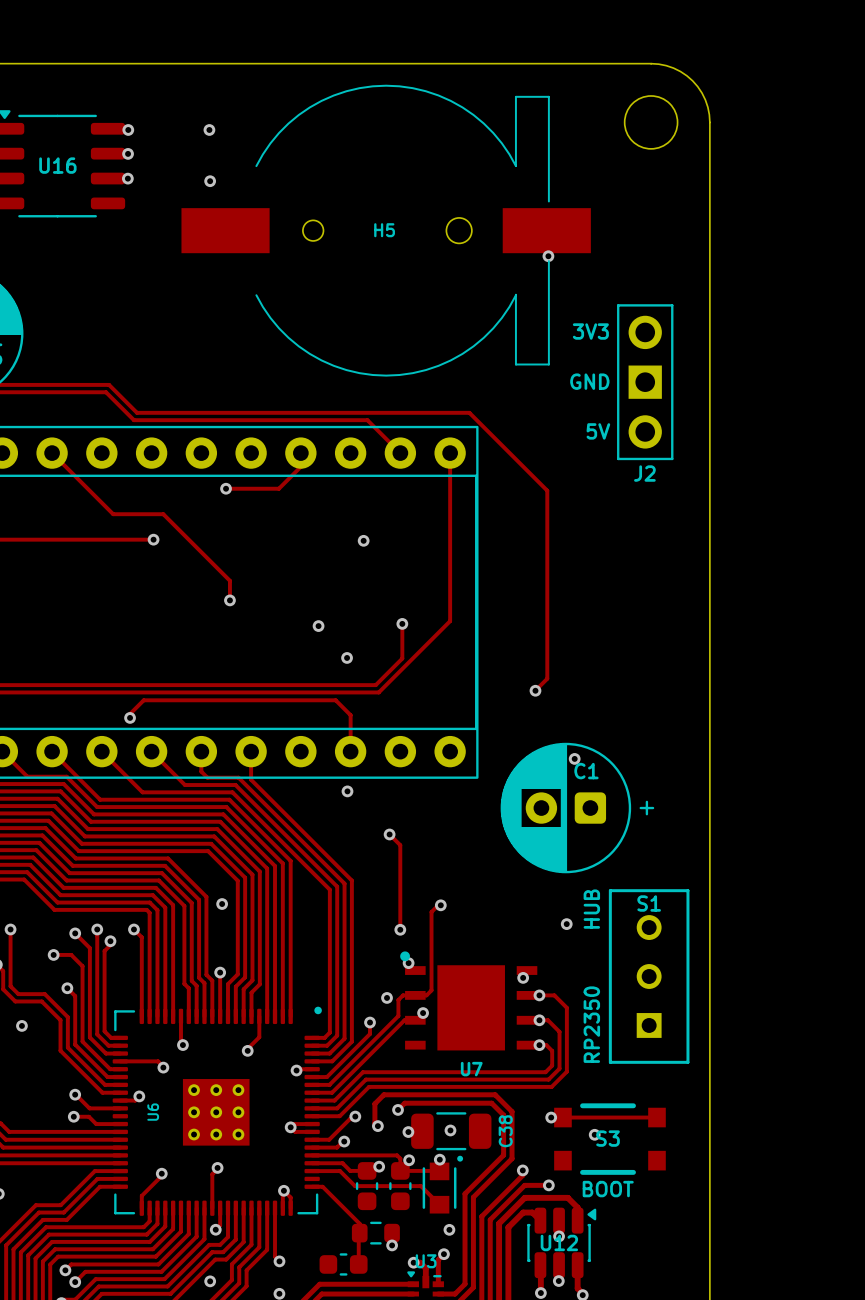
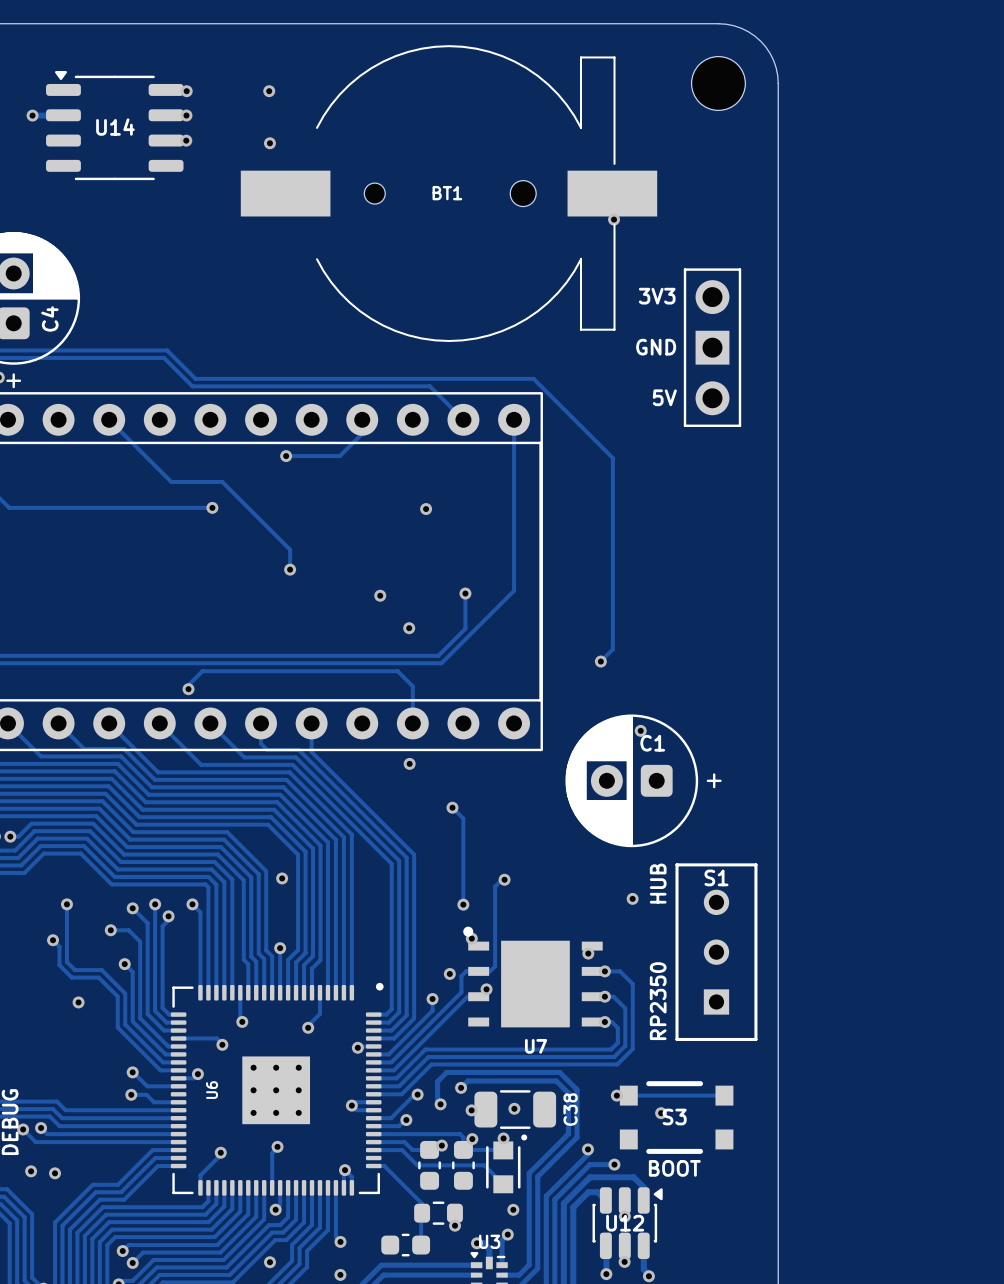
U16 name: U16 (57, 165) -> U14 (115, 127)
H5 name: H5 (384, 230) -> BT1 (447, 193)
J2 name: J2 (644, 473) -> none

